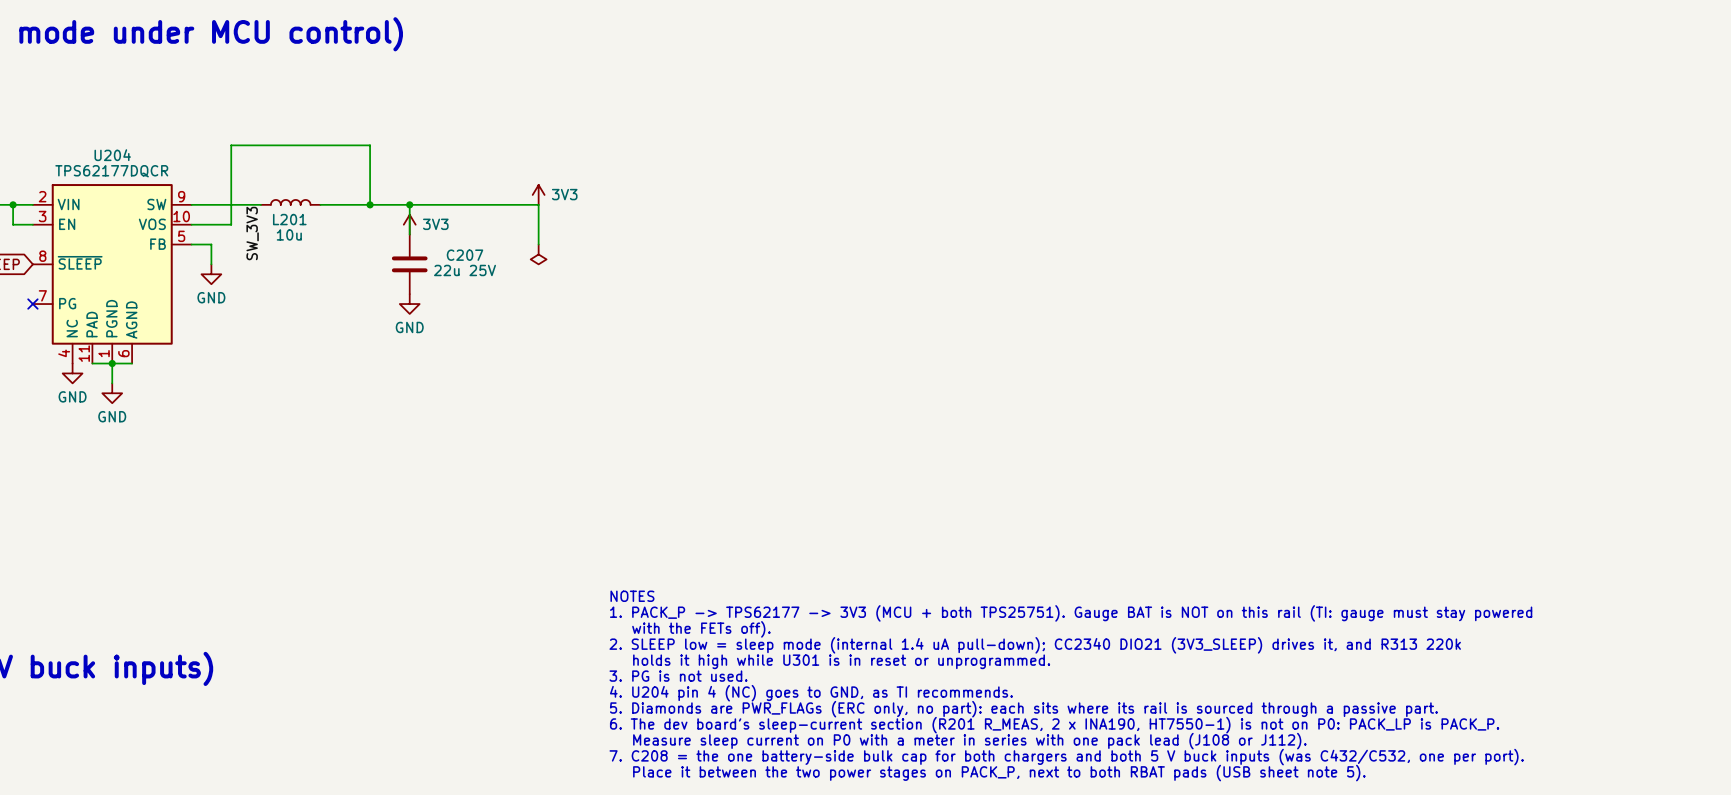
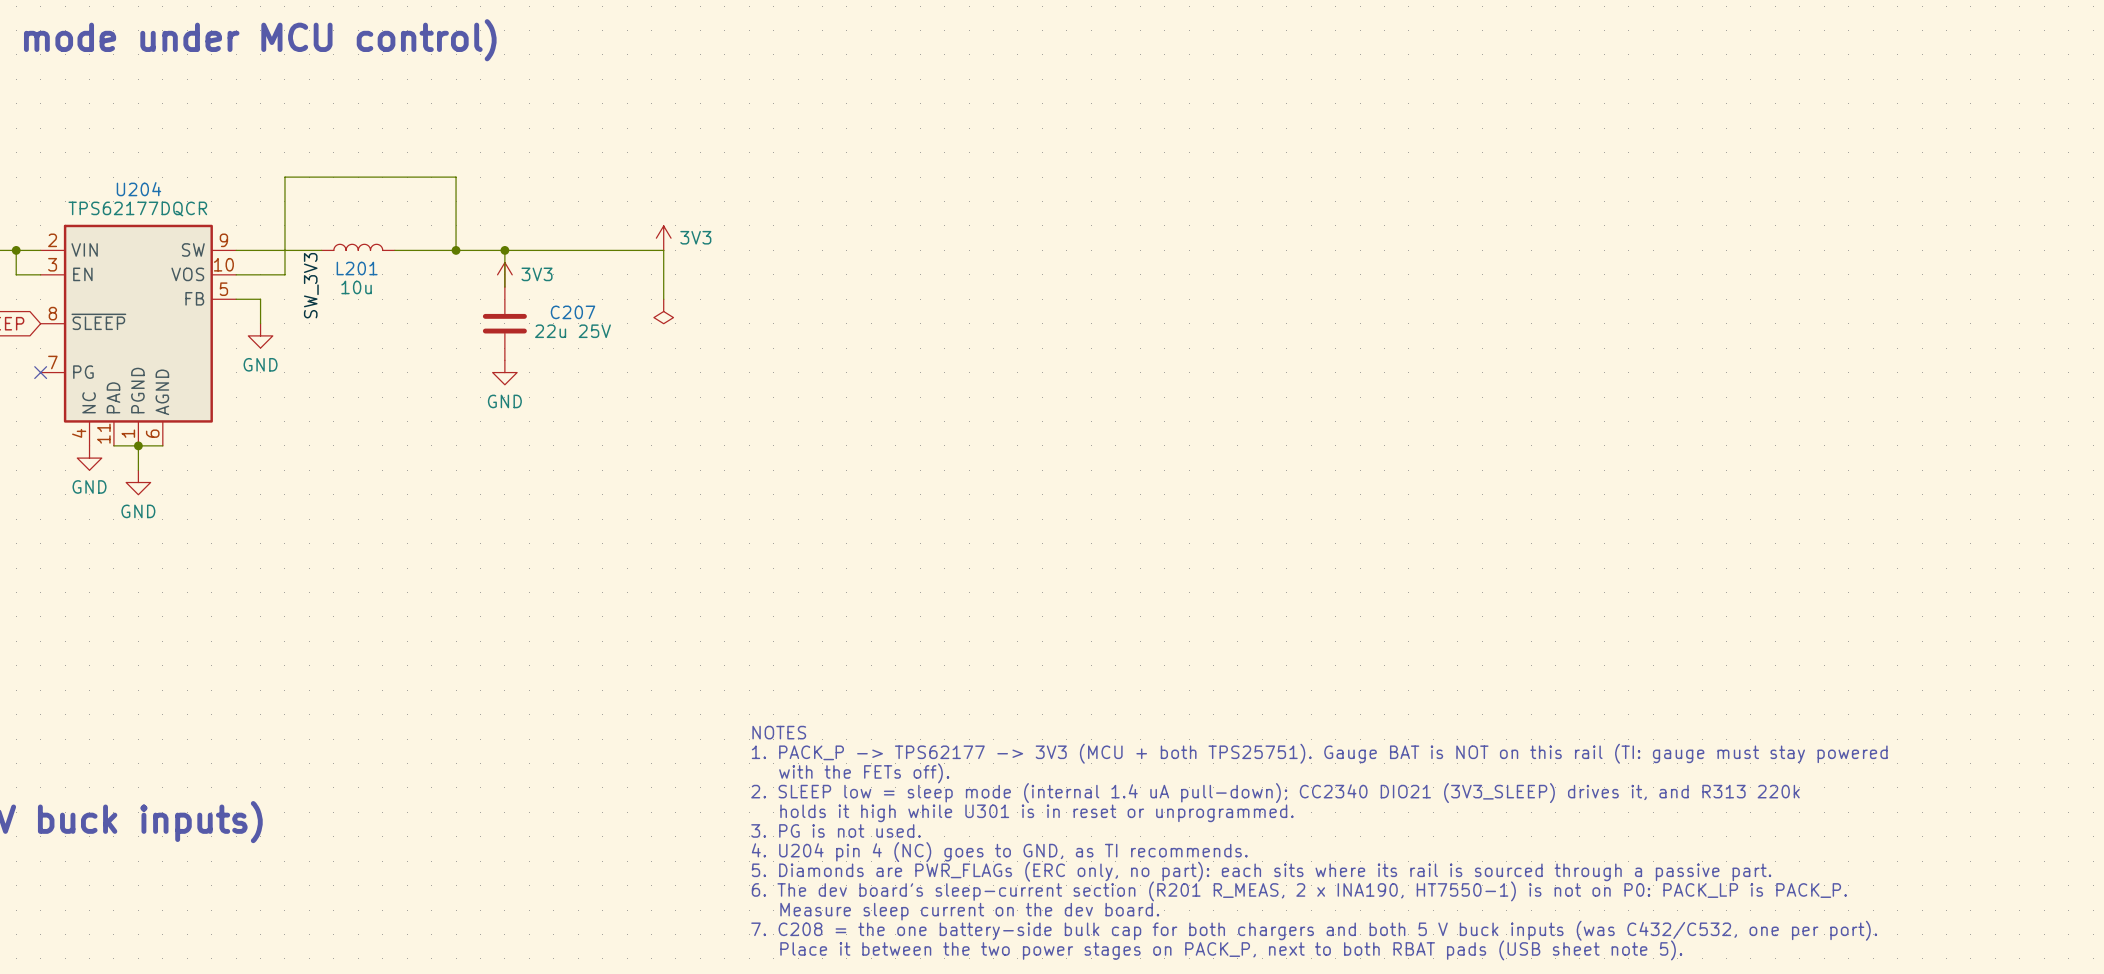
text: Measure sleep current on P0 with a meter in series with one pack lead (J108 or J112). (969, 741) -> Measure sleep current on the dev board. (969, 911)

